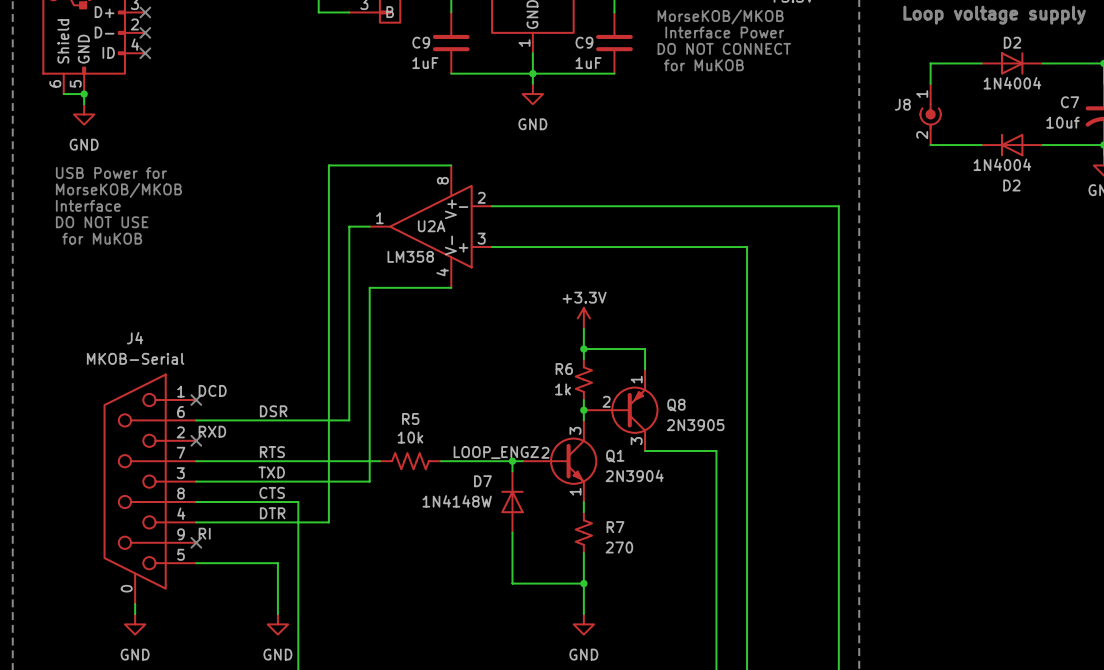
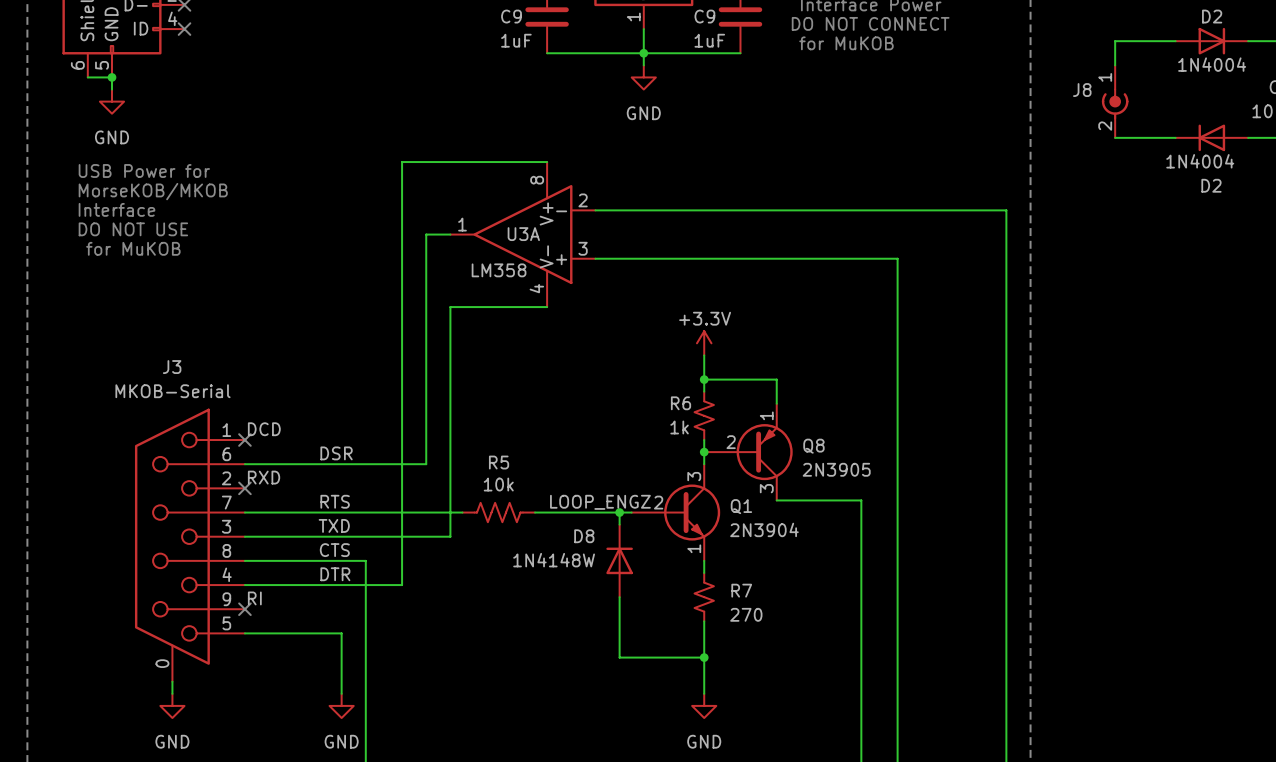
U2A name: U2A (431, 226) -> U3A (523, 234)
J4 name: J4 (135, 338) -> J3 (172, 367)
D7 name: D7 (482, 481) -> D8 (584, 536)

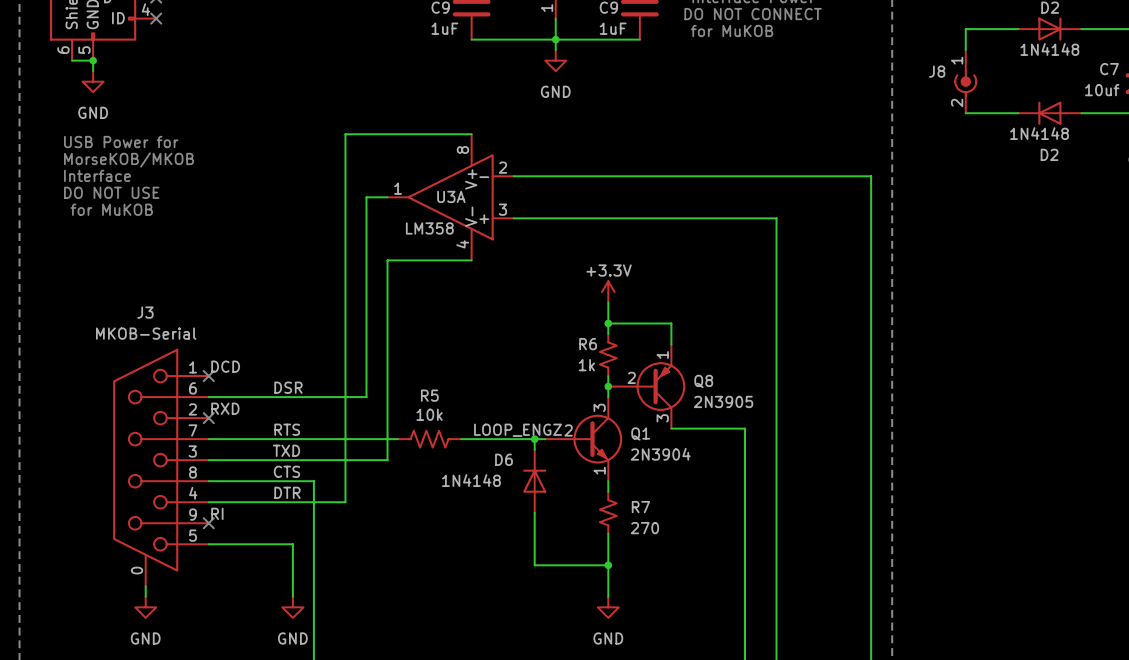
D2 value: 1N4004 (1212, 64) -> 1N4148 (1049, 49)
D2 value: 1N4004 (1200, 161) -> 1N4148 (1039, 133)
D8 name: D8 (584, 536) -> D6 (504, 459)
D8 value: 1N4148W (554, 560) -> 1N4148 (471, 480)

